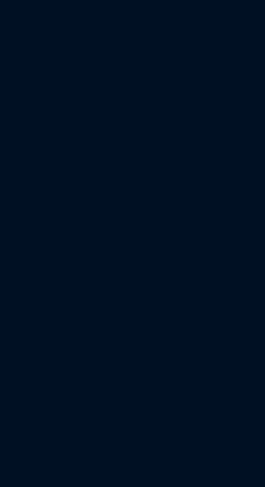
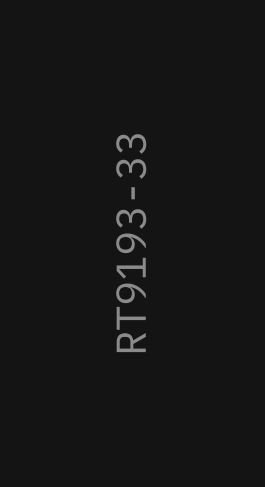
part: none -> RT9193-33 (131, 243)

